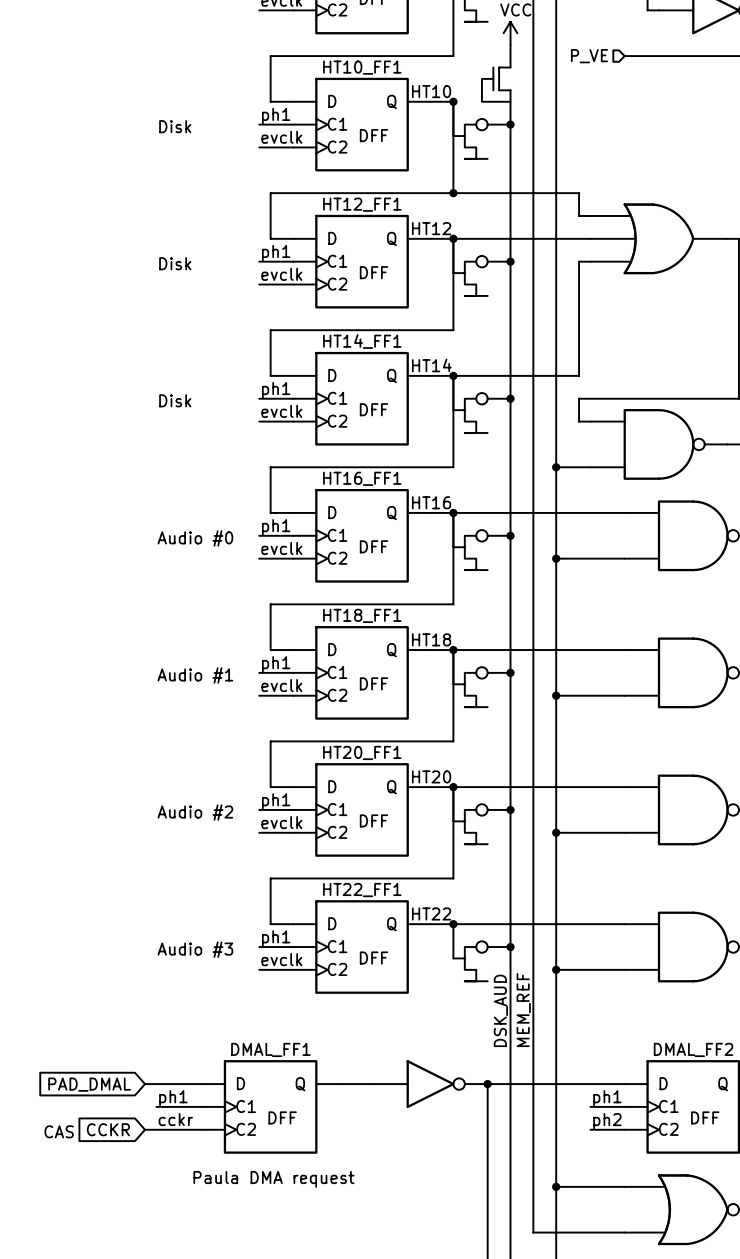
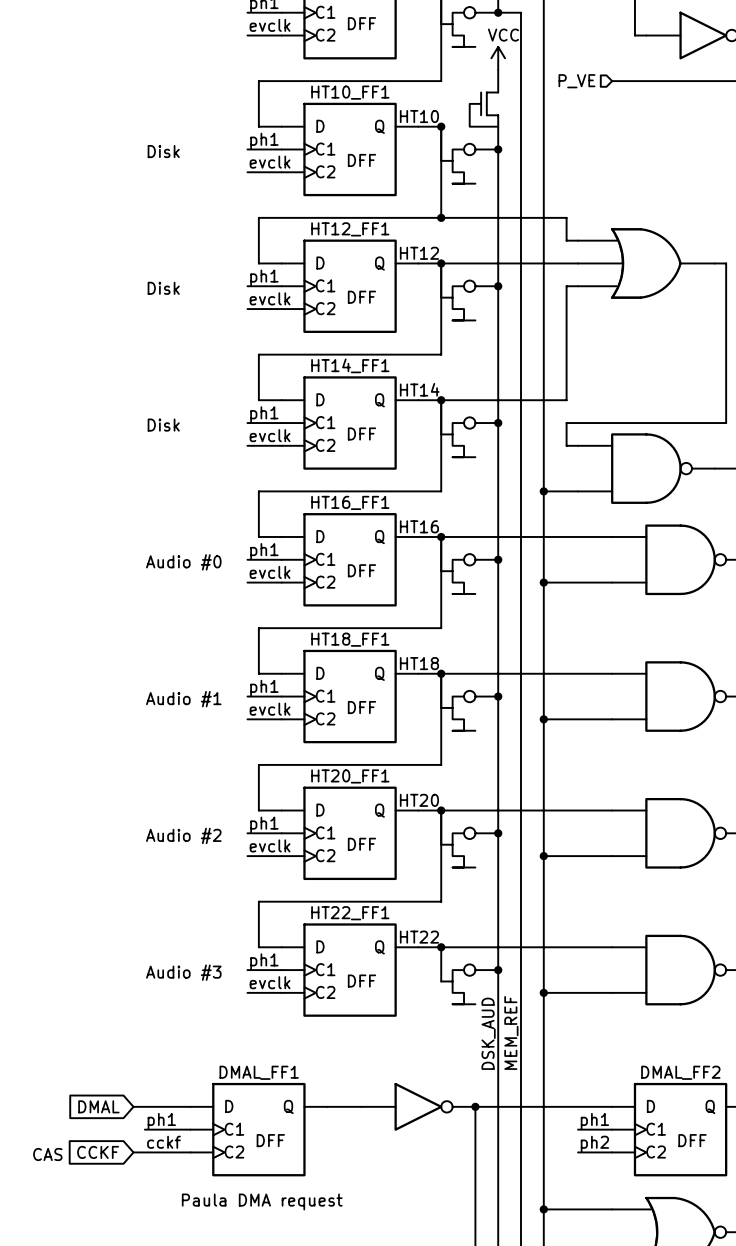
global label: PAD_DMAL (89, 1084) -> DMAL (98, 1106)
label: cckr (175, 1119) -> cckf (163, 1142)
global label: CCKR (108, 1129) -> CCKF (98, 1152)

